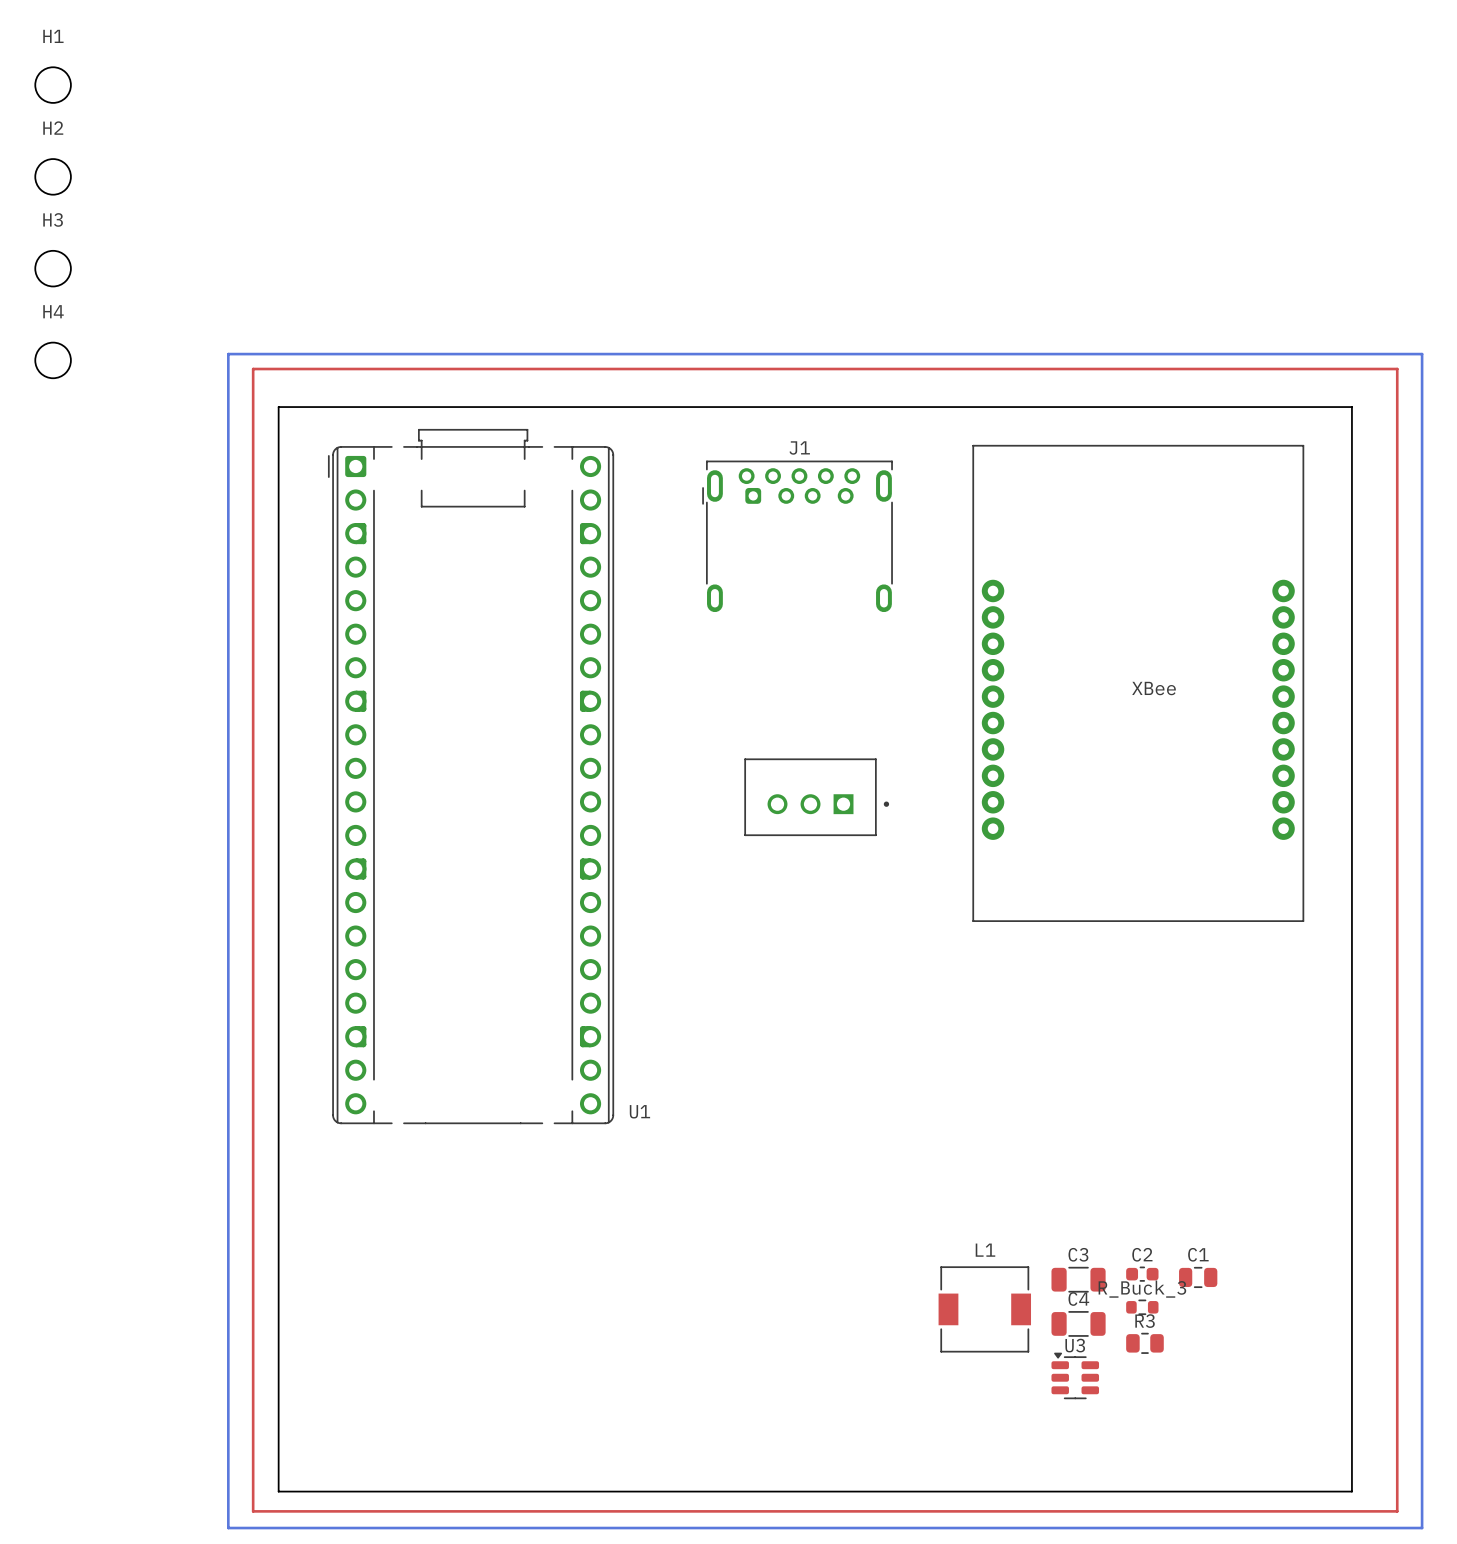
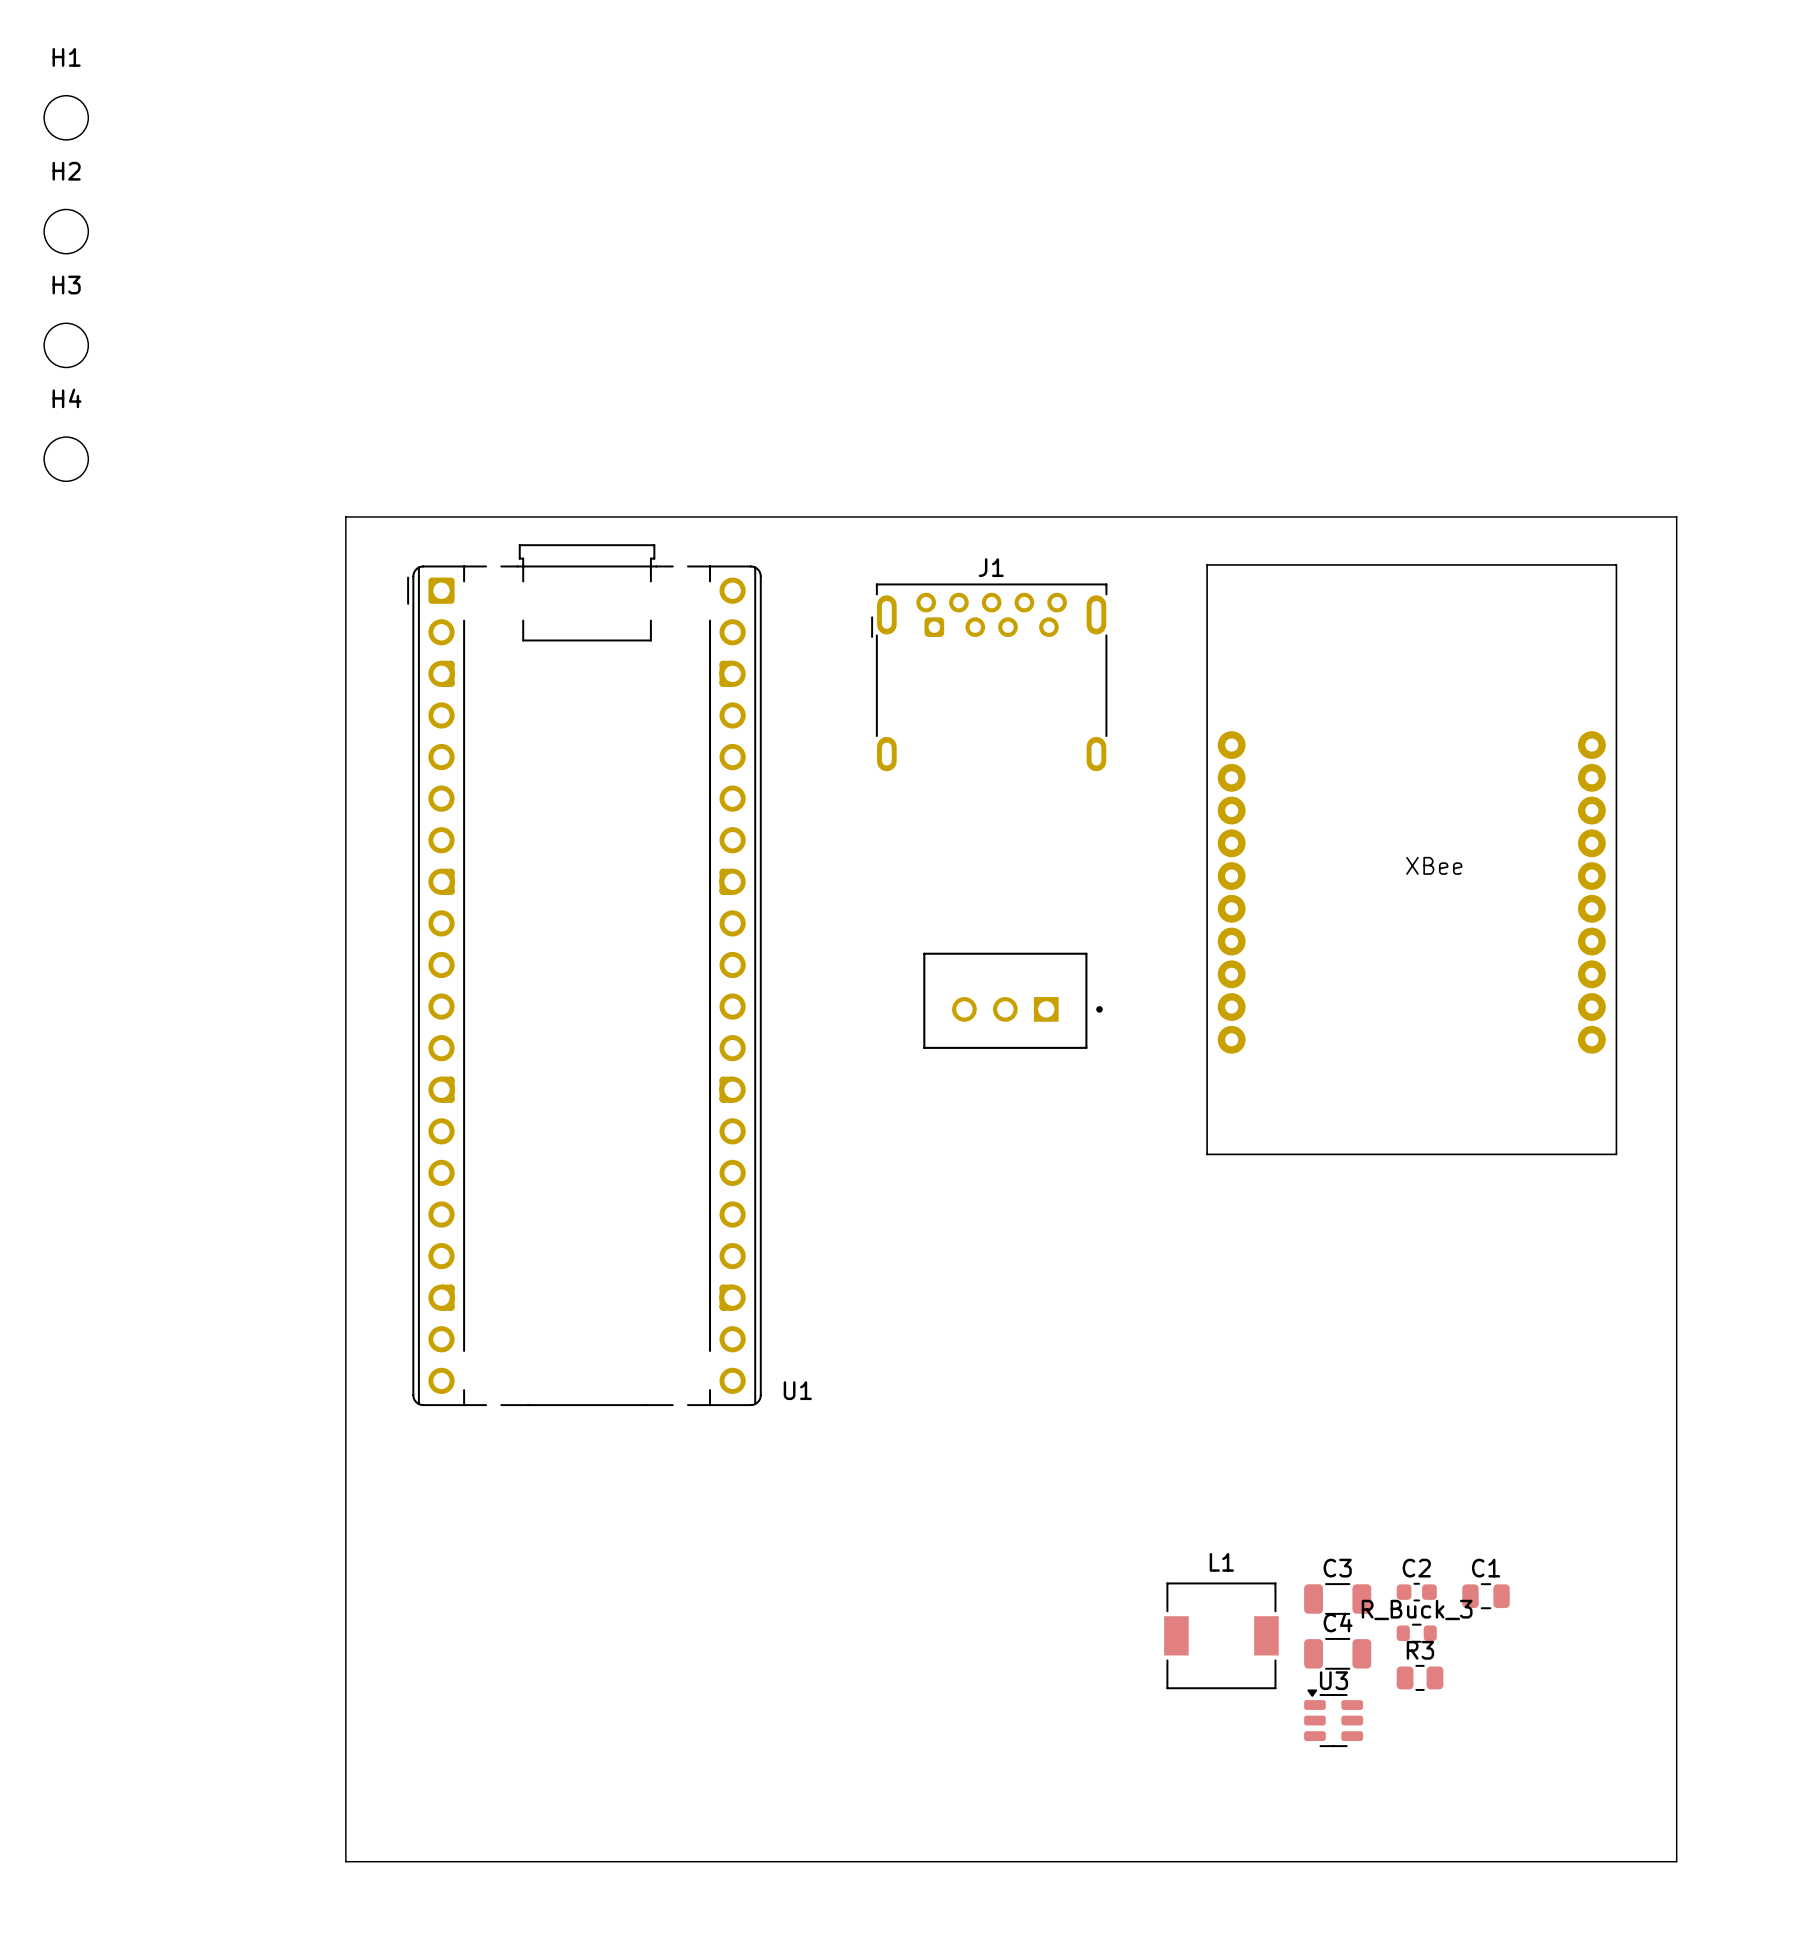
bottom track: (228, 354) (1422, 354) (1422, 1528) (228, 1528) (228, 354) -> none
top track: (253, 369) (1397, 369) (1397, 1511) (253, 1511) (253, 369) -> none

